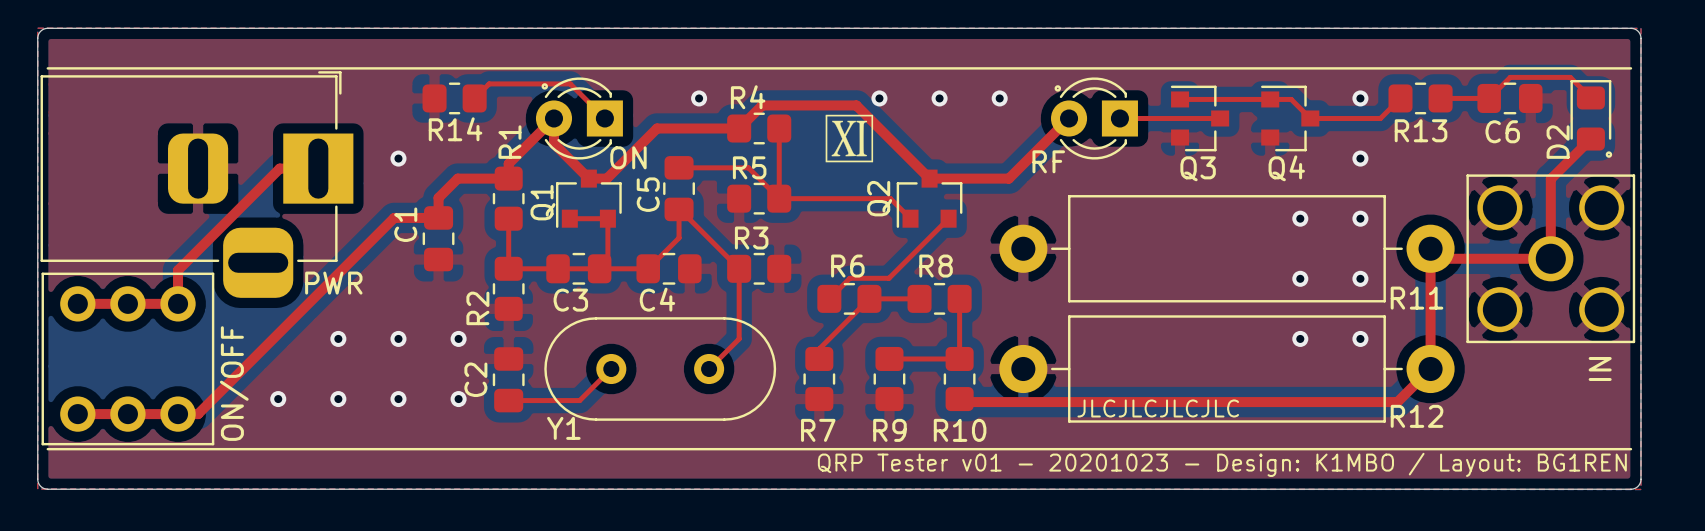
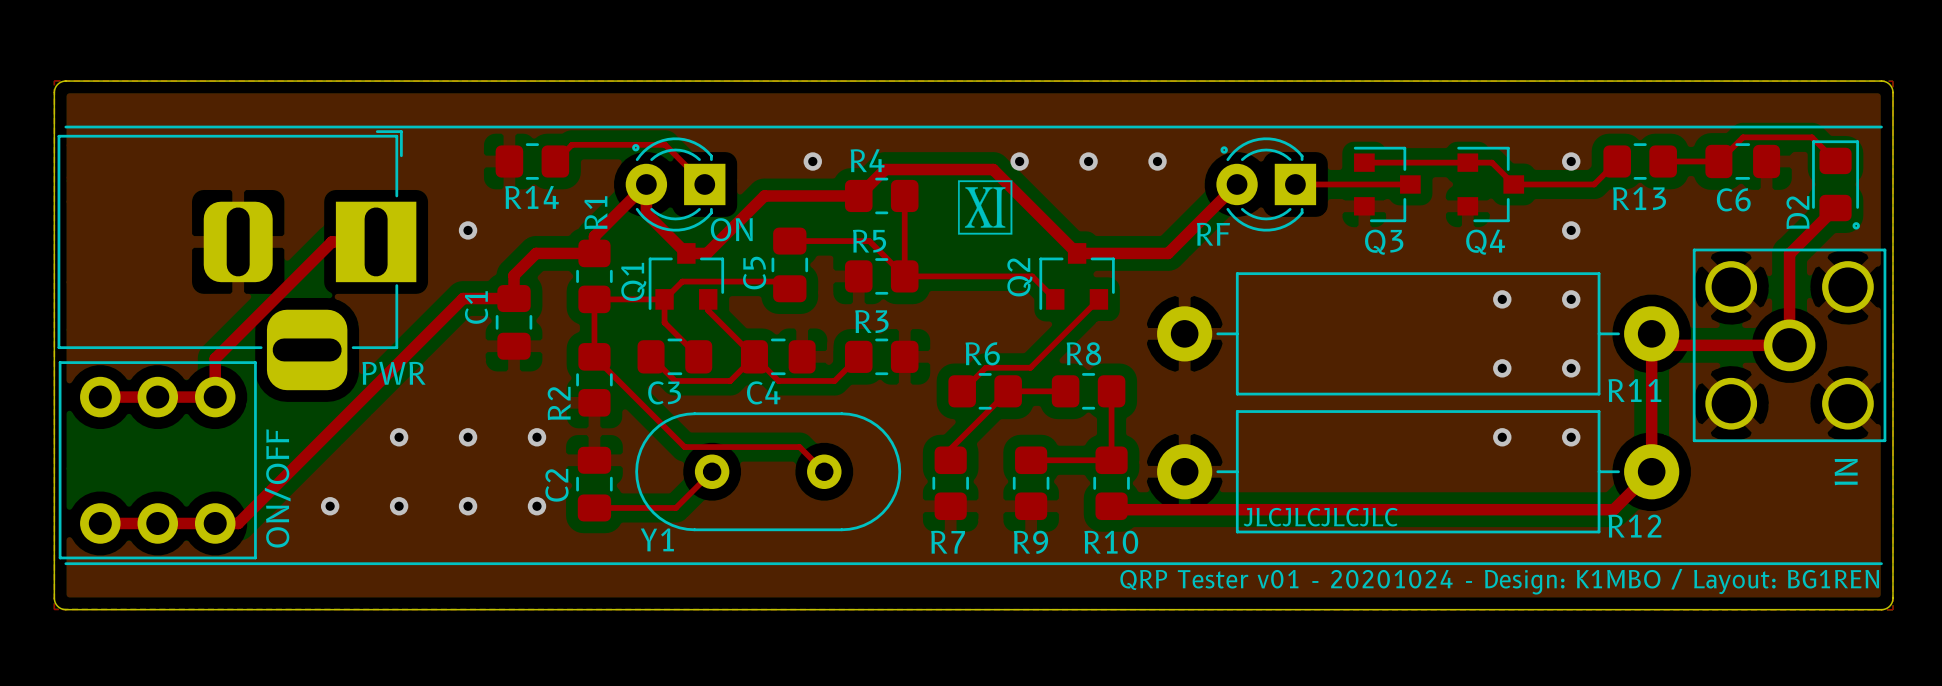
top track: (679, 209) (679, 237) (648, 268) (508, 268) -> (789, 288) (782, 281) (682, 281) (664, 299)
top track: (679, 209) (739, 268) (739, 338) (709, 369) -> (594, 356) (684, 447) (799, 447) (824, 471)
top track: none -> (594, 299) (664, 299)
top track: (569, 218) (607, 218) -> (664, 299) (664, 322) (698, 356)
top track: (607, 228) (607, 260) -> (708, 310) (778, 380) (834, 380) (858, 356)
top track: none -> (651, 356) (675, 380) (730, 380) (754, 356)
text: QRP Tester v01 - 20201023 - Design: K1MBO / Layout: BG1REN (1222, 464) -> QRP Tester v01 - 20201024 - Design: K1MBO / Layout: BG1REN (1499, 581)

